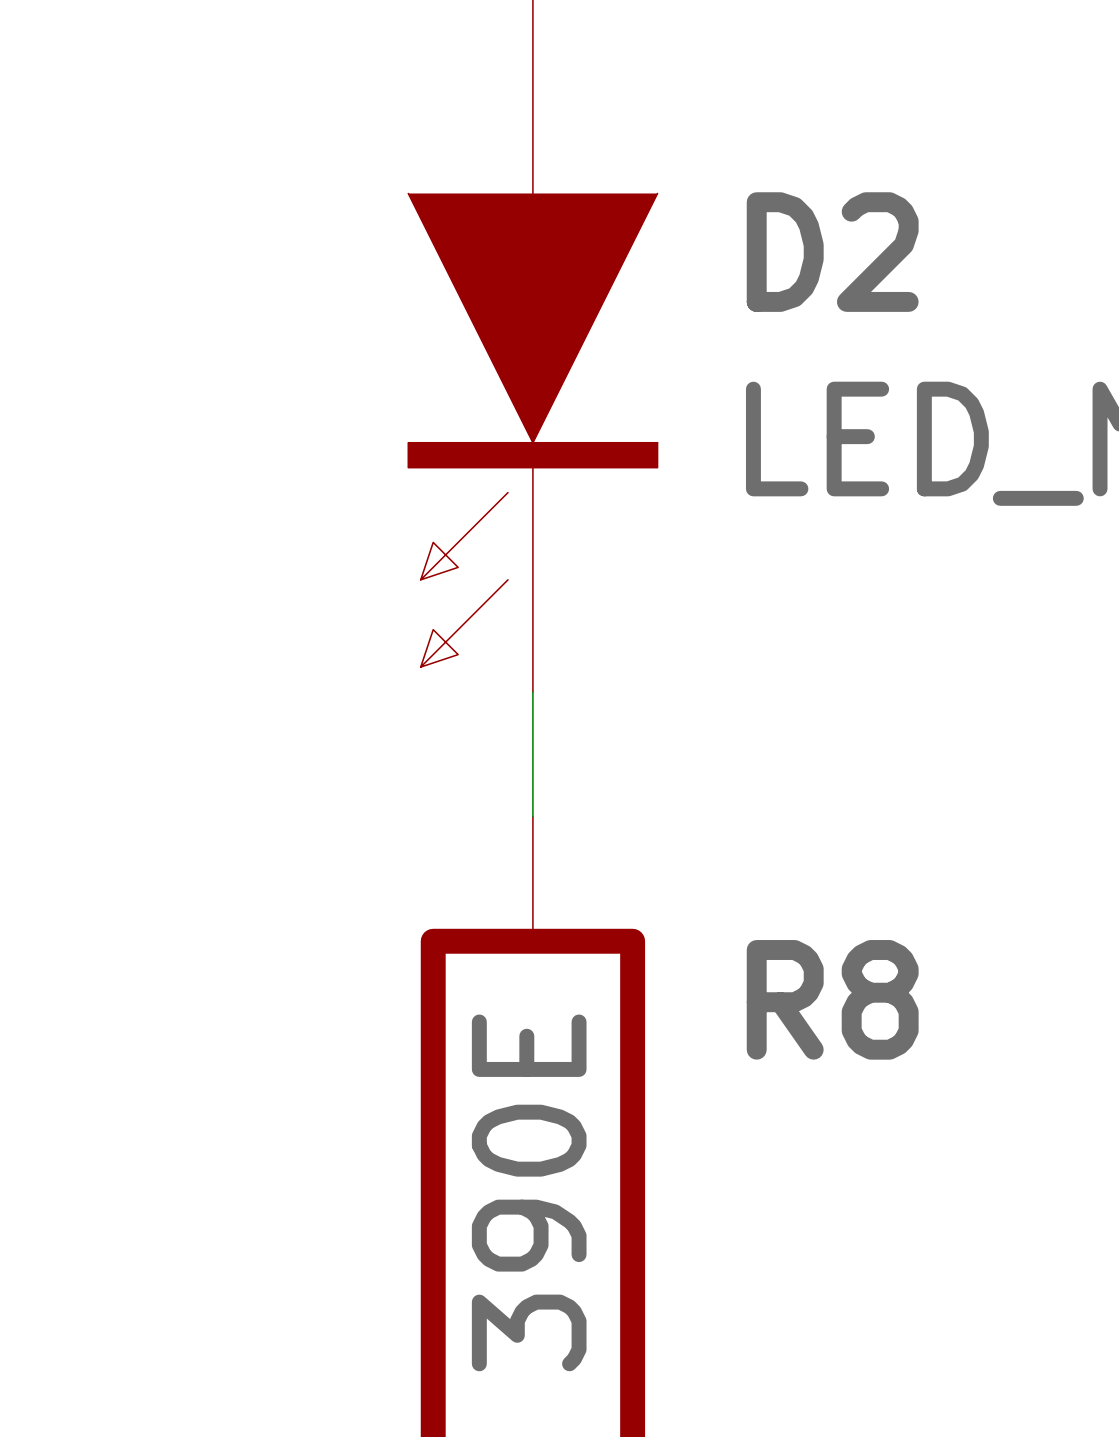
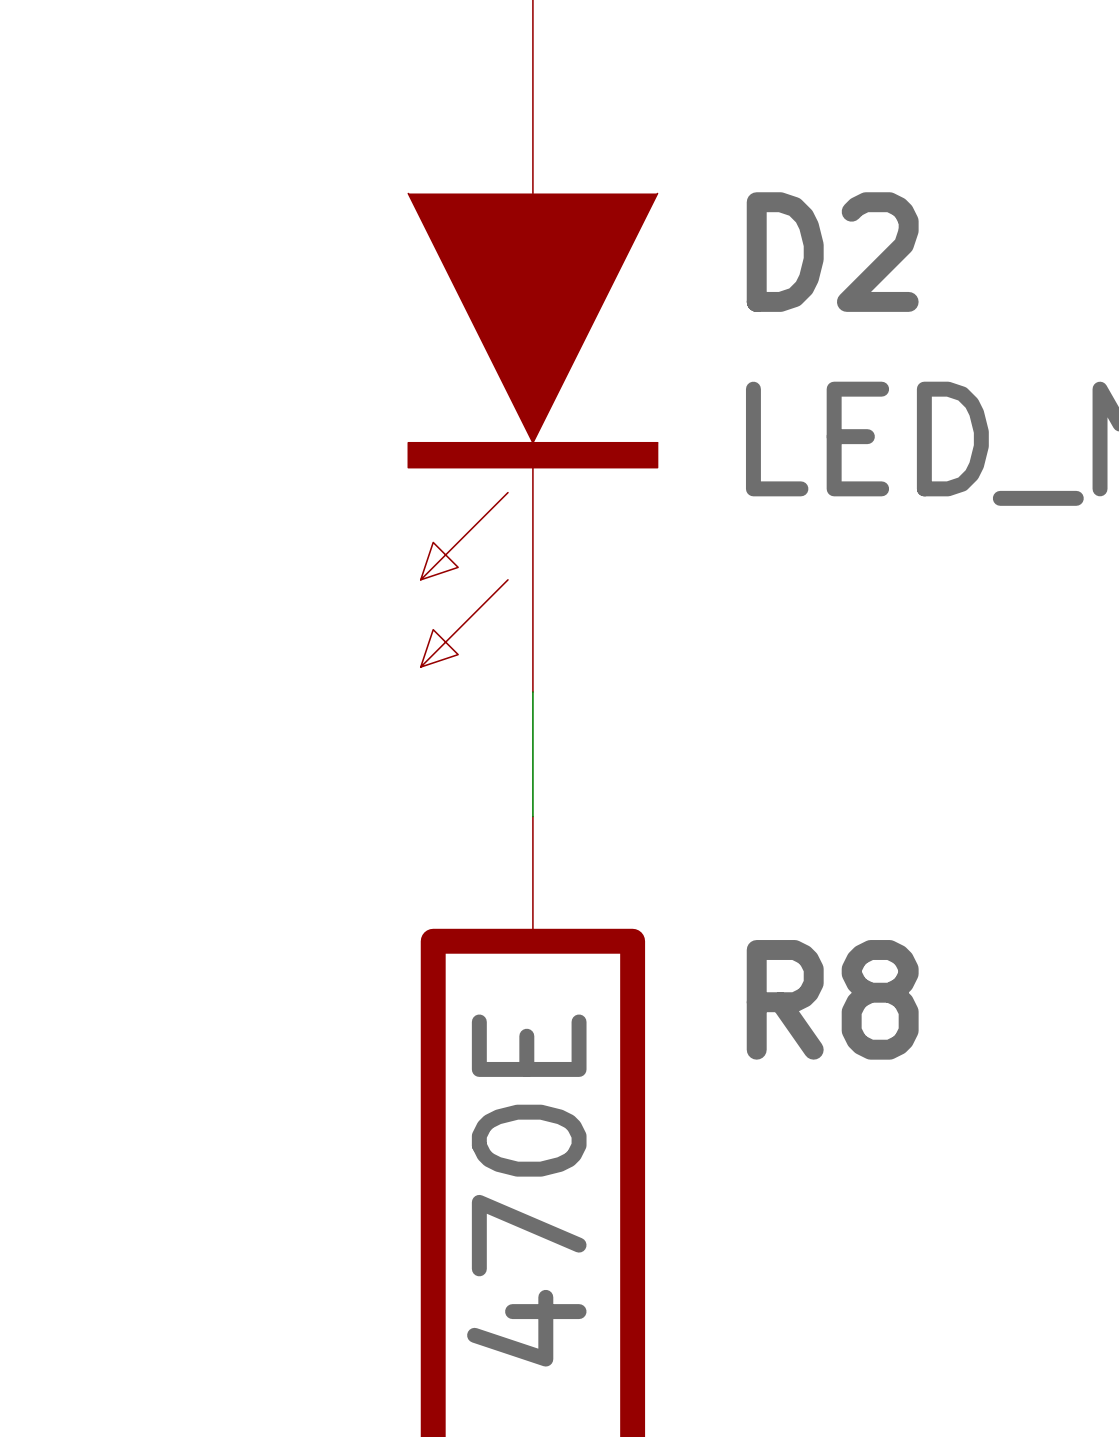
R8 value: 390E (529, 1192) -> 470E (526, 1190)

